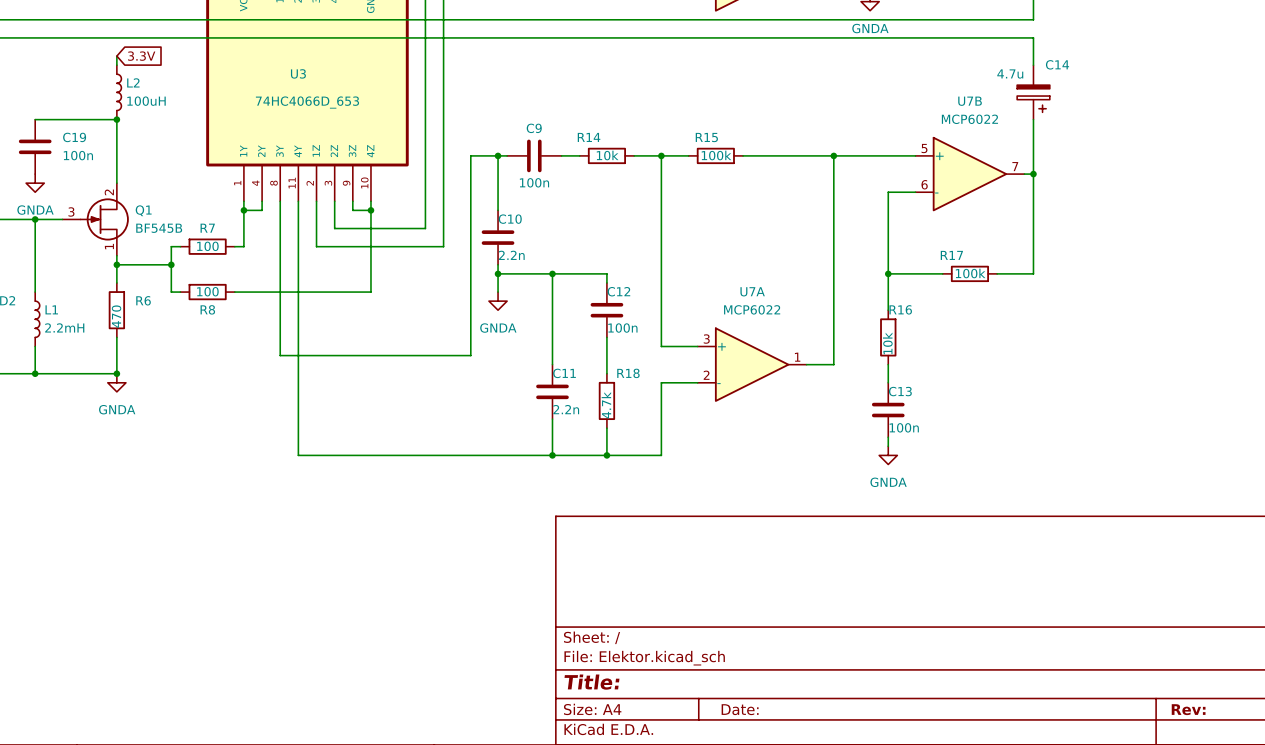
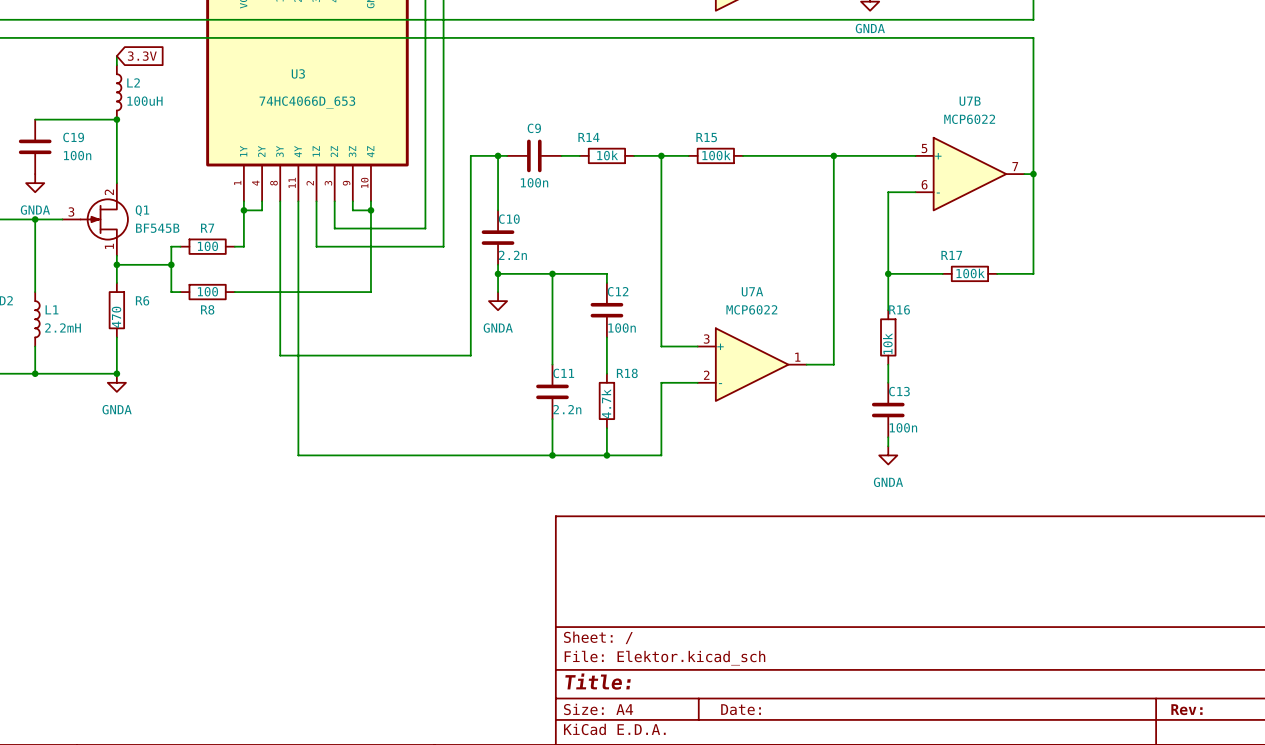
C14: 4.7u (1033, 92) -> none

